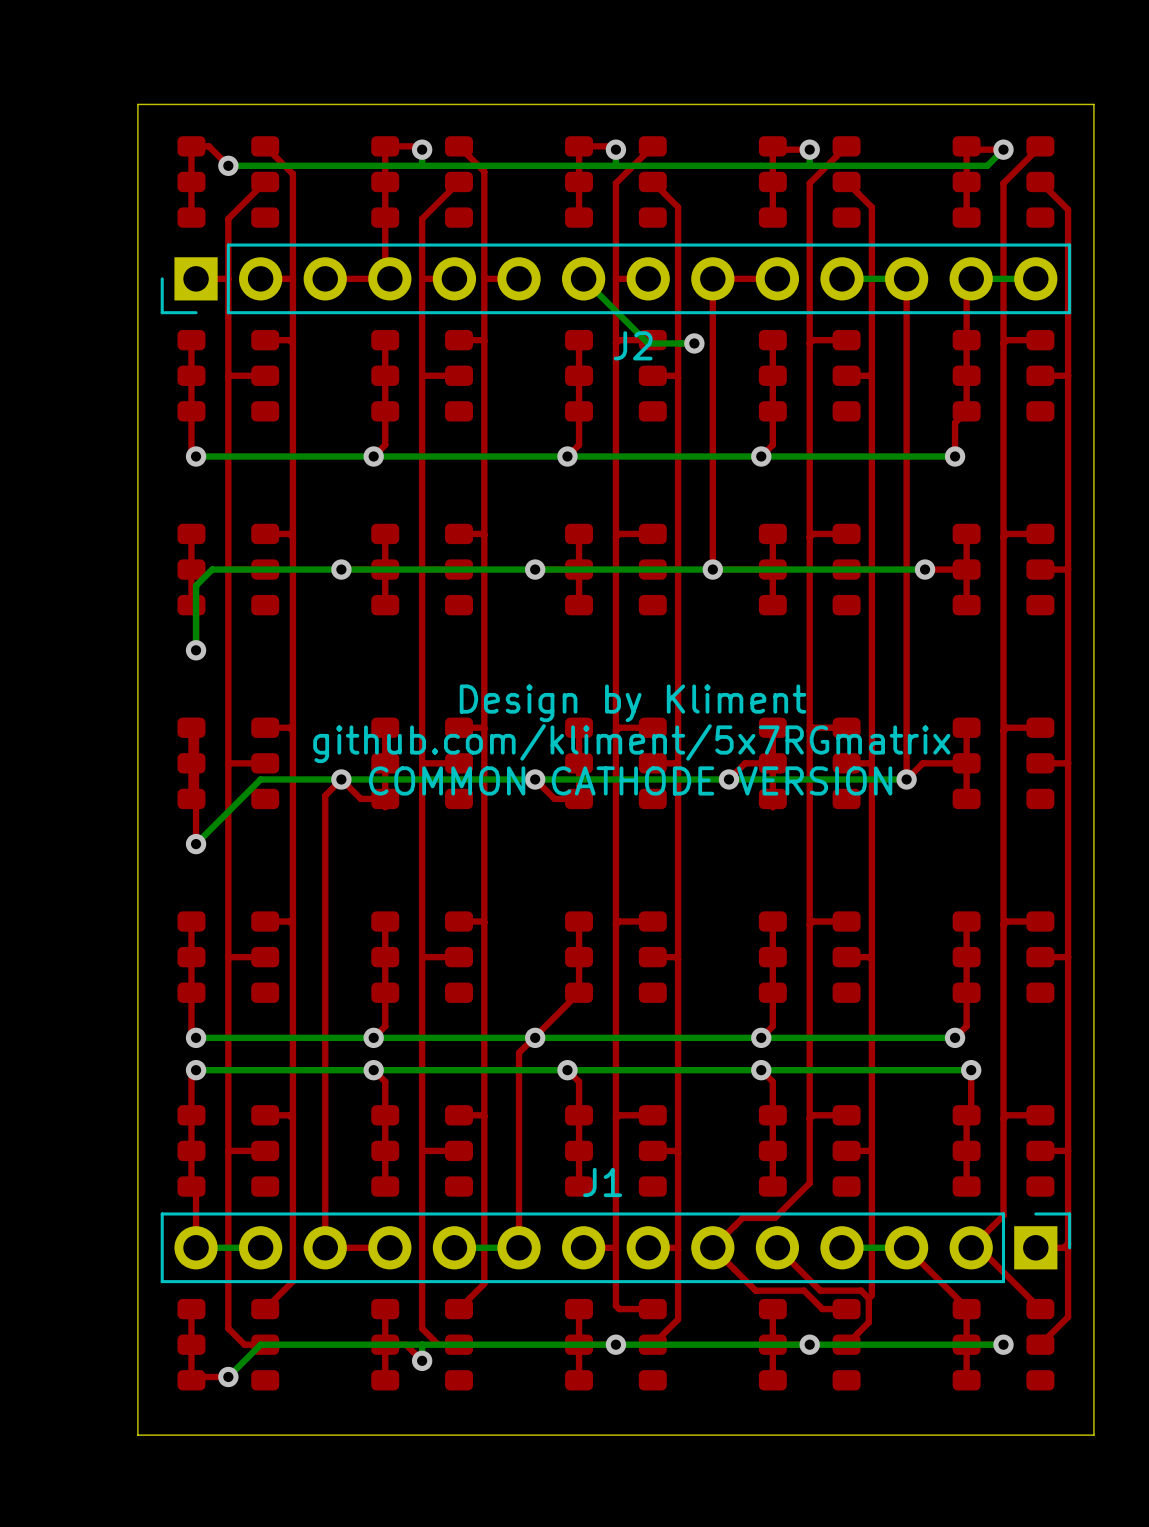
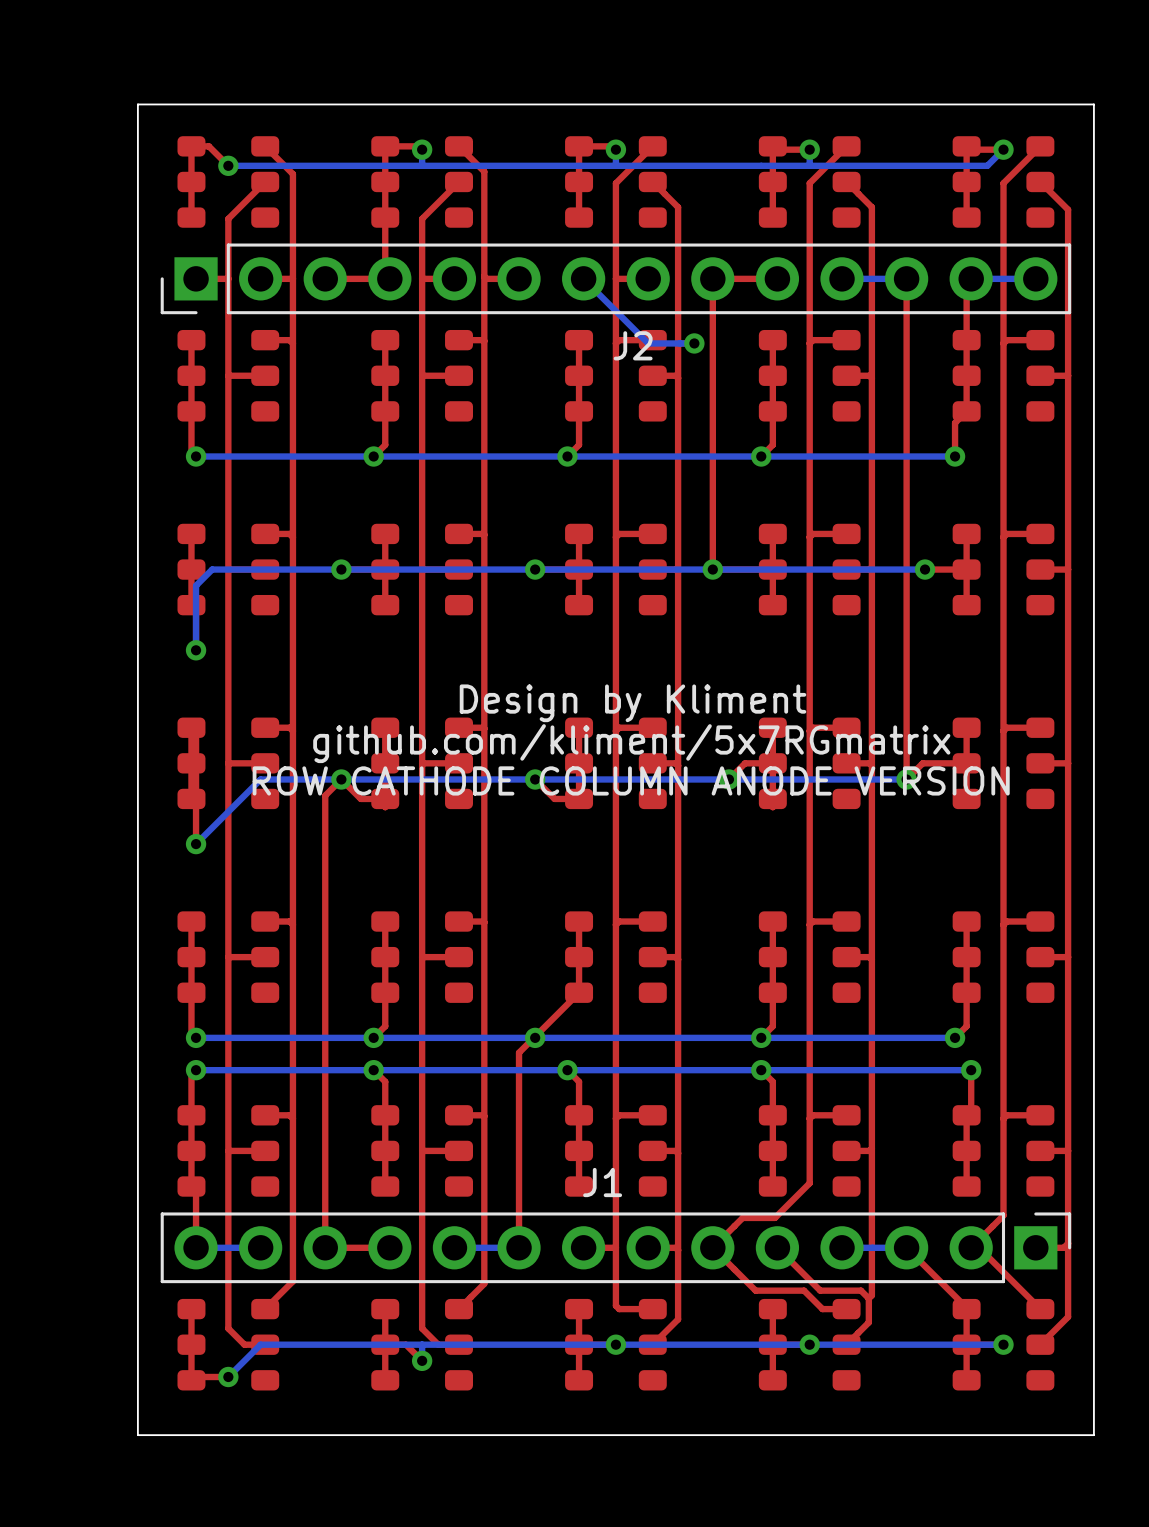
text: COMMON CATHODE VERSION (630, 780) -> ROW CATHODE COLUMN ANODE VERSION (631, 780)

